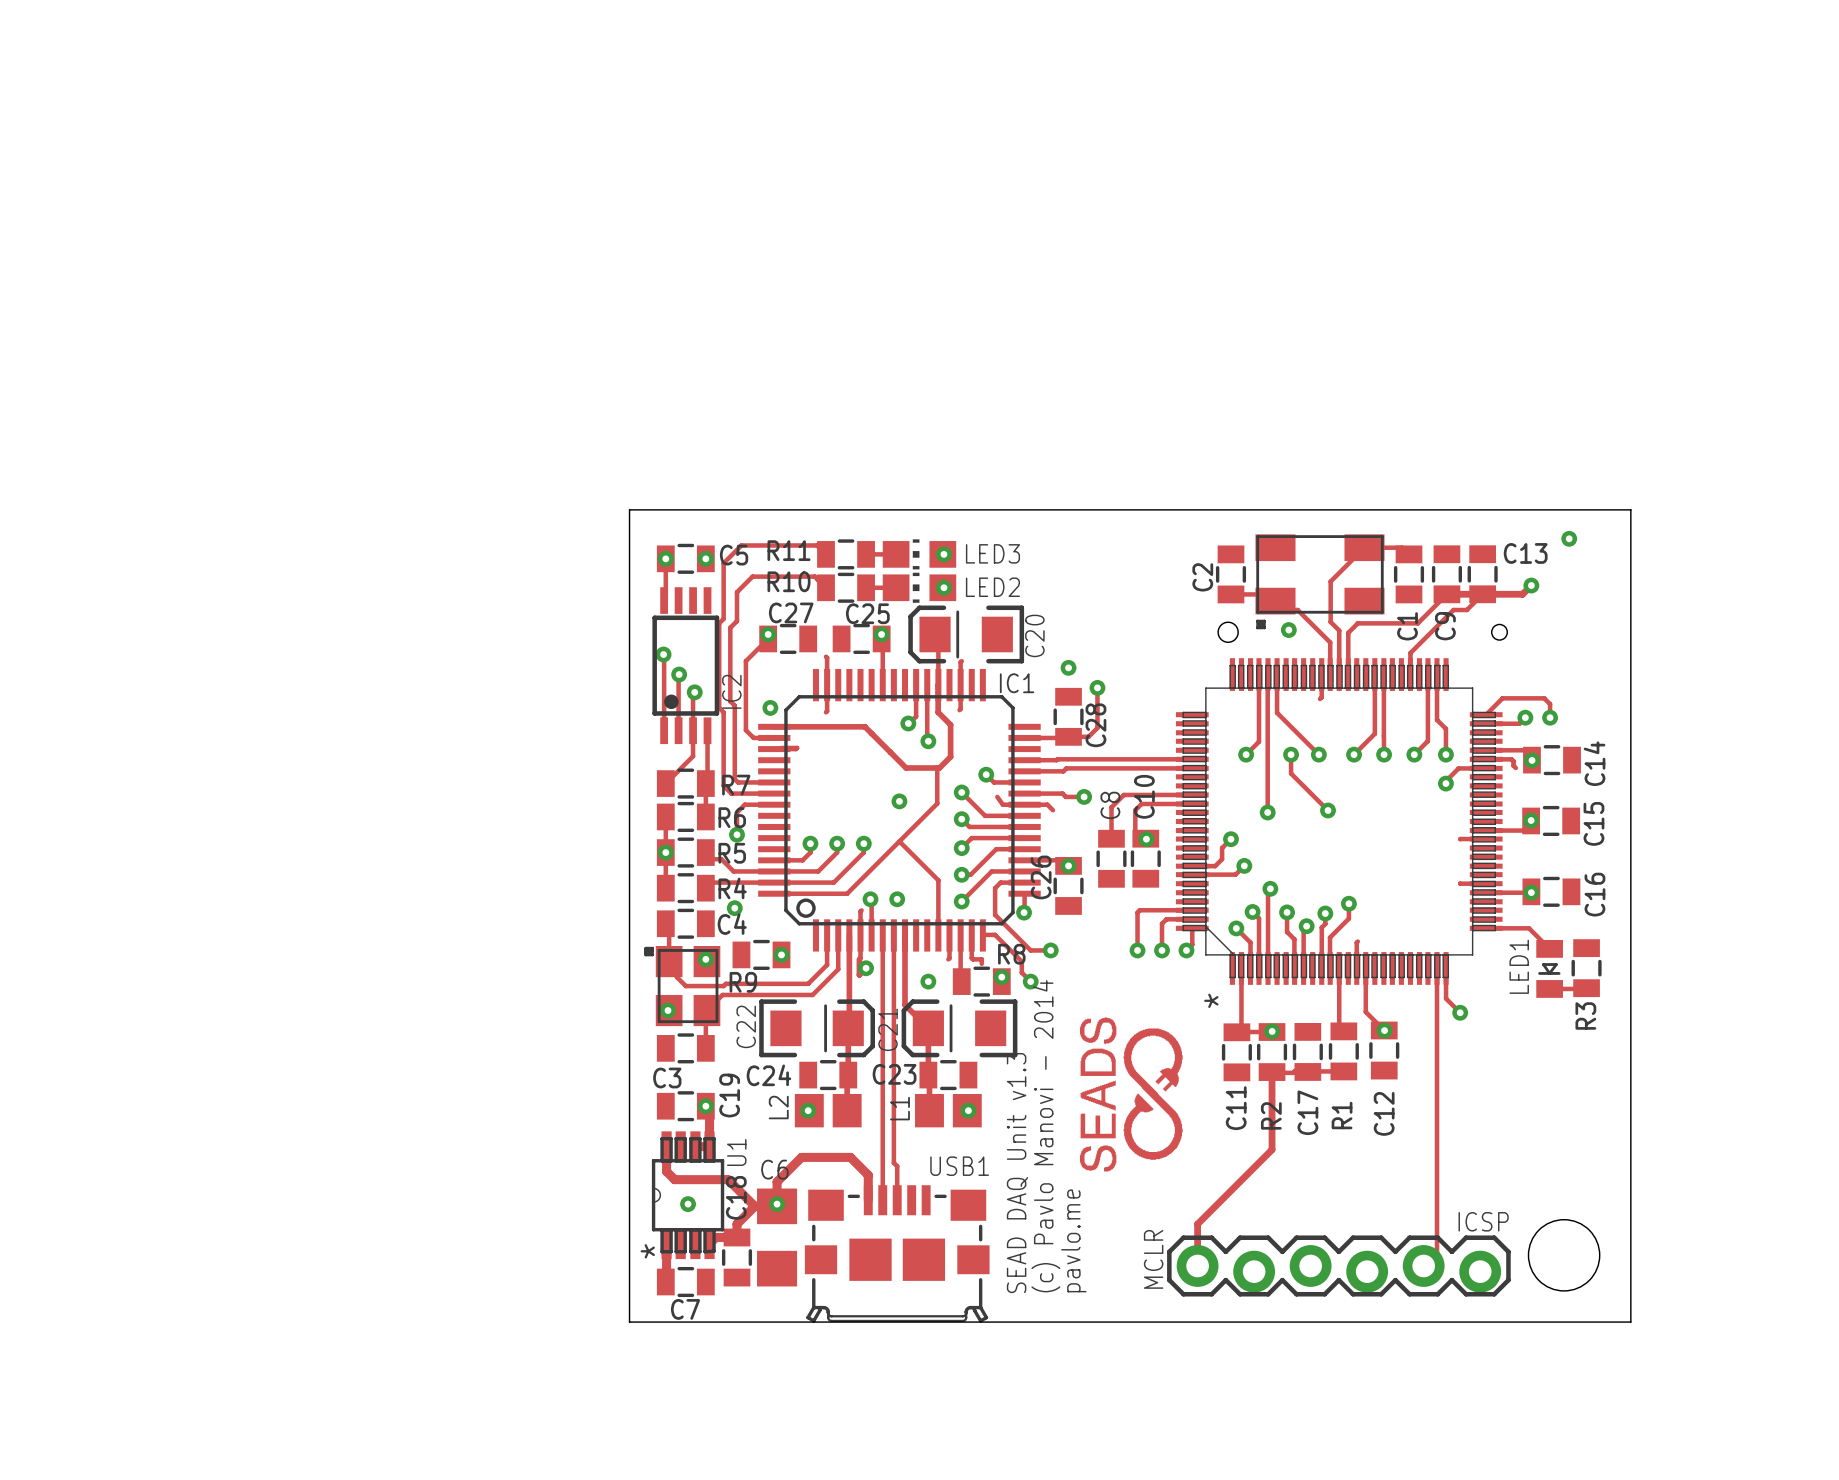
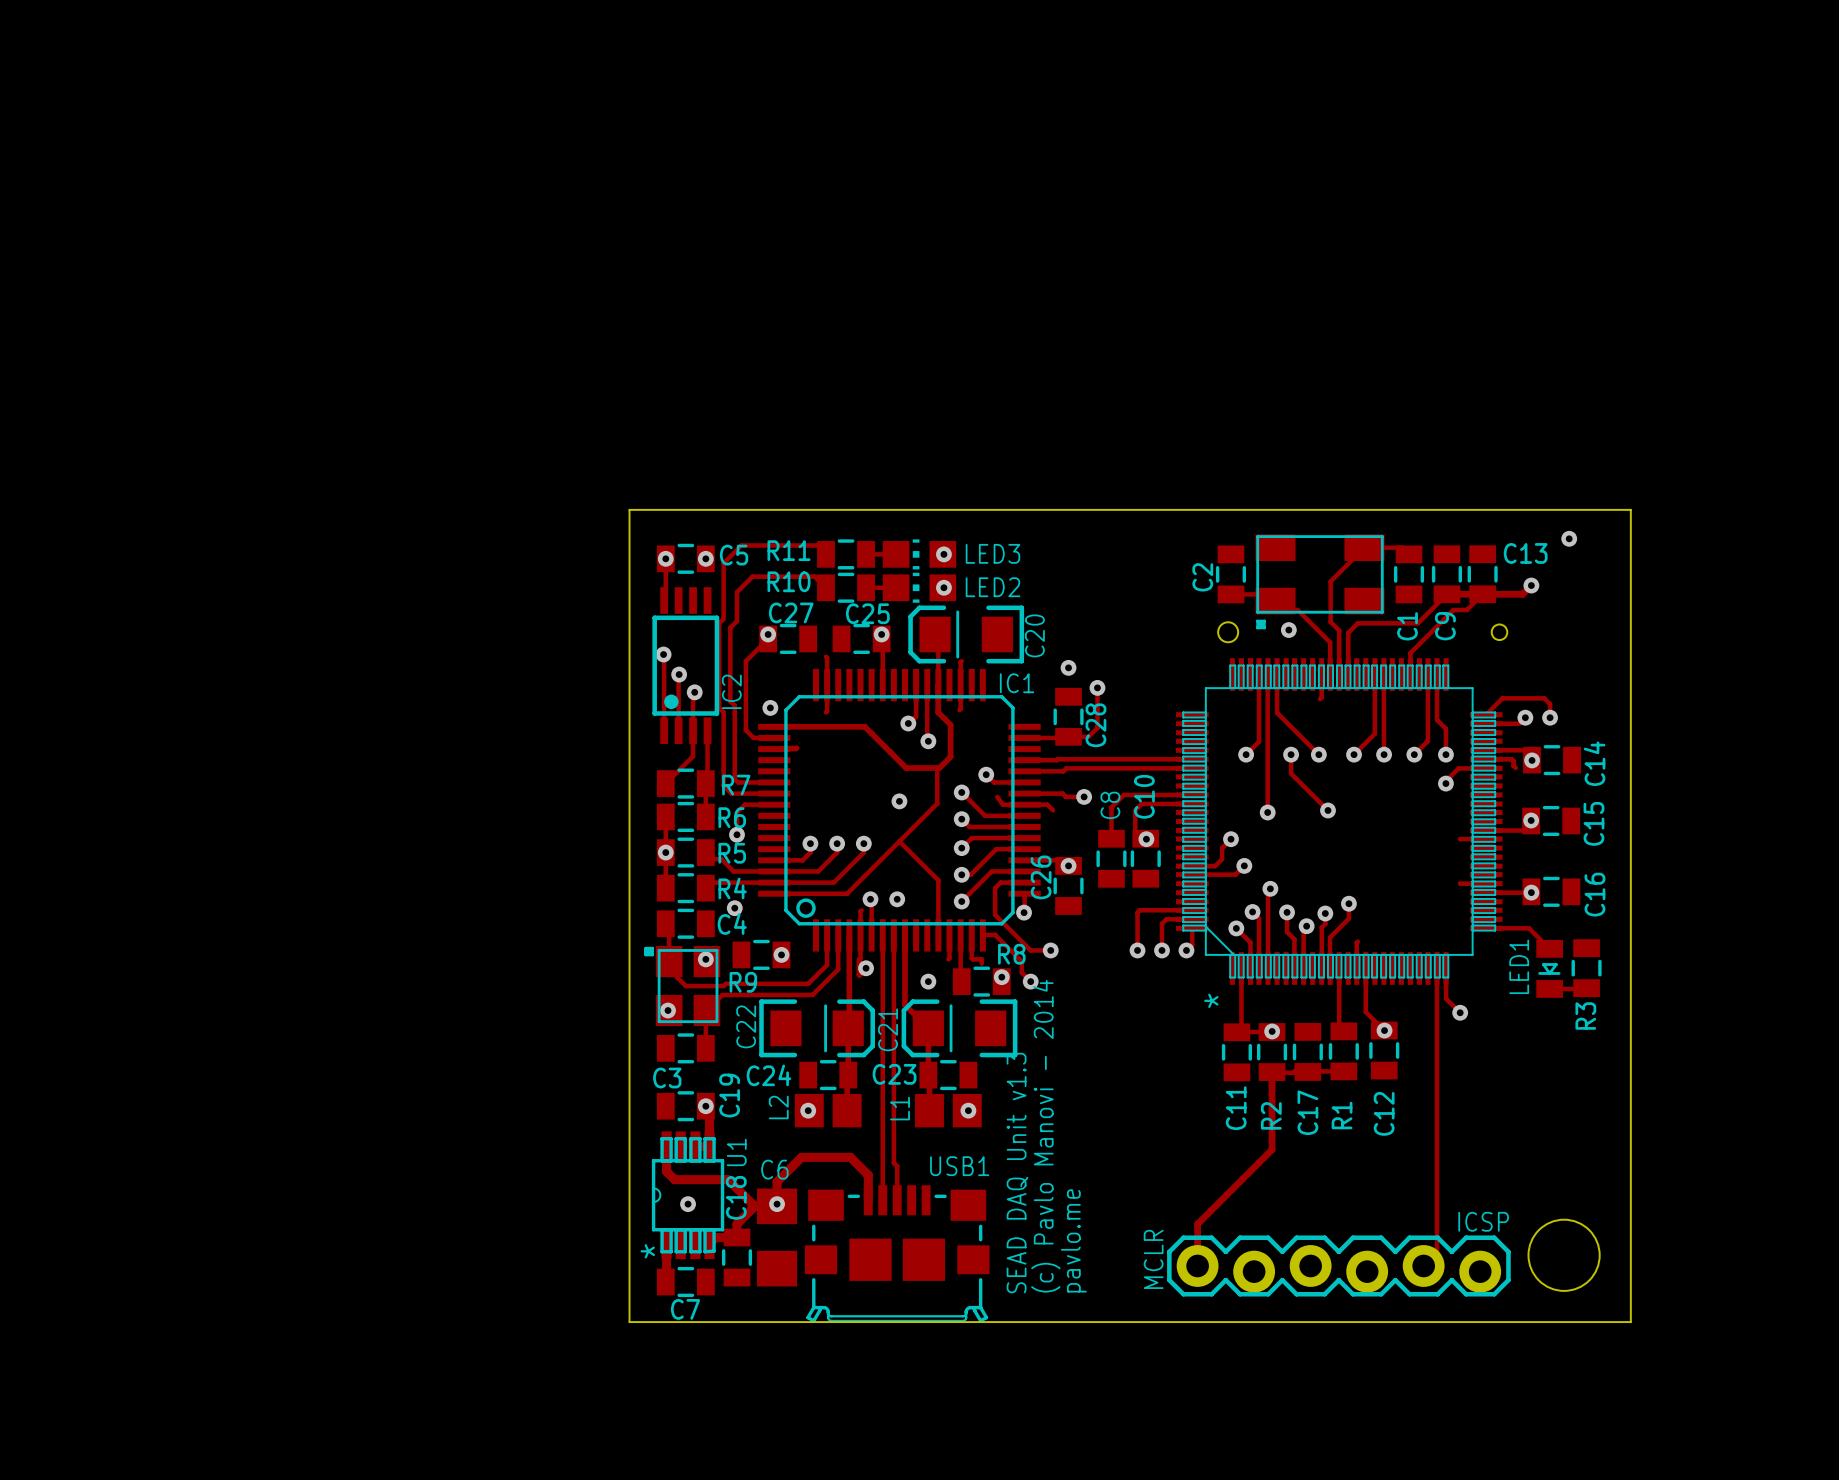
drawing: [1079, 1017, 1183, 1172] -> none
track: (1176, 1113) (1176, 1147) -> none

